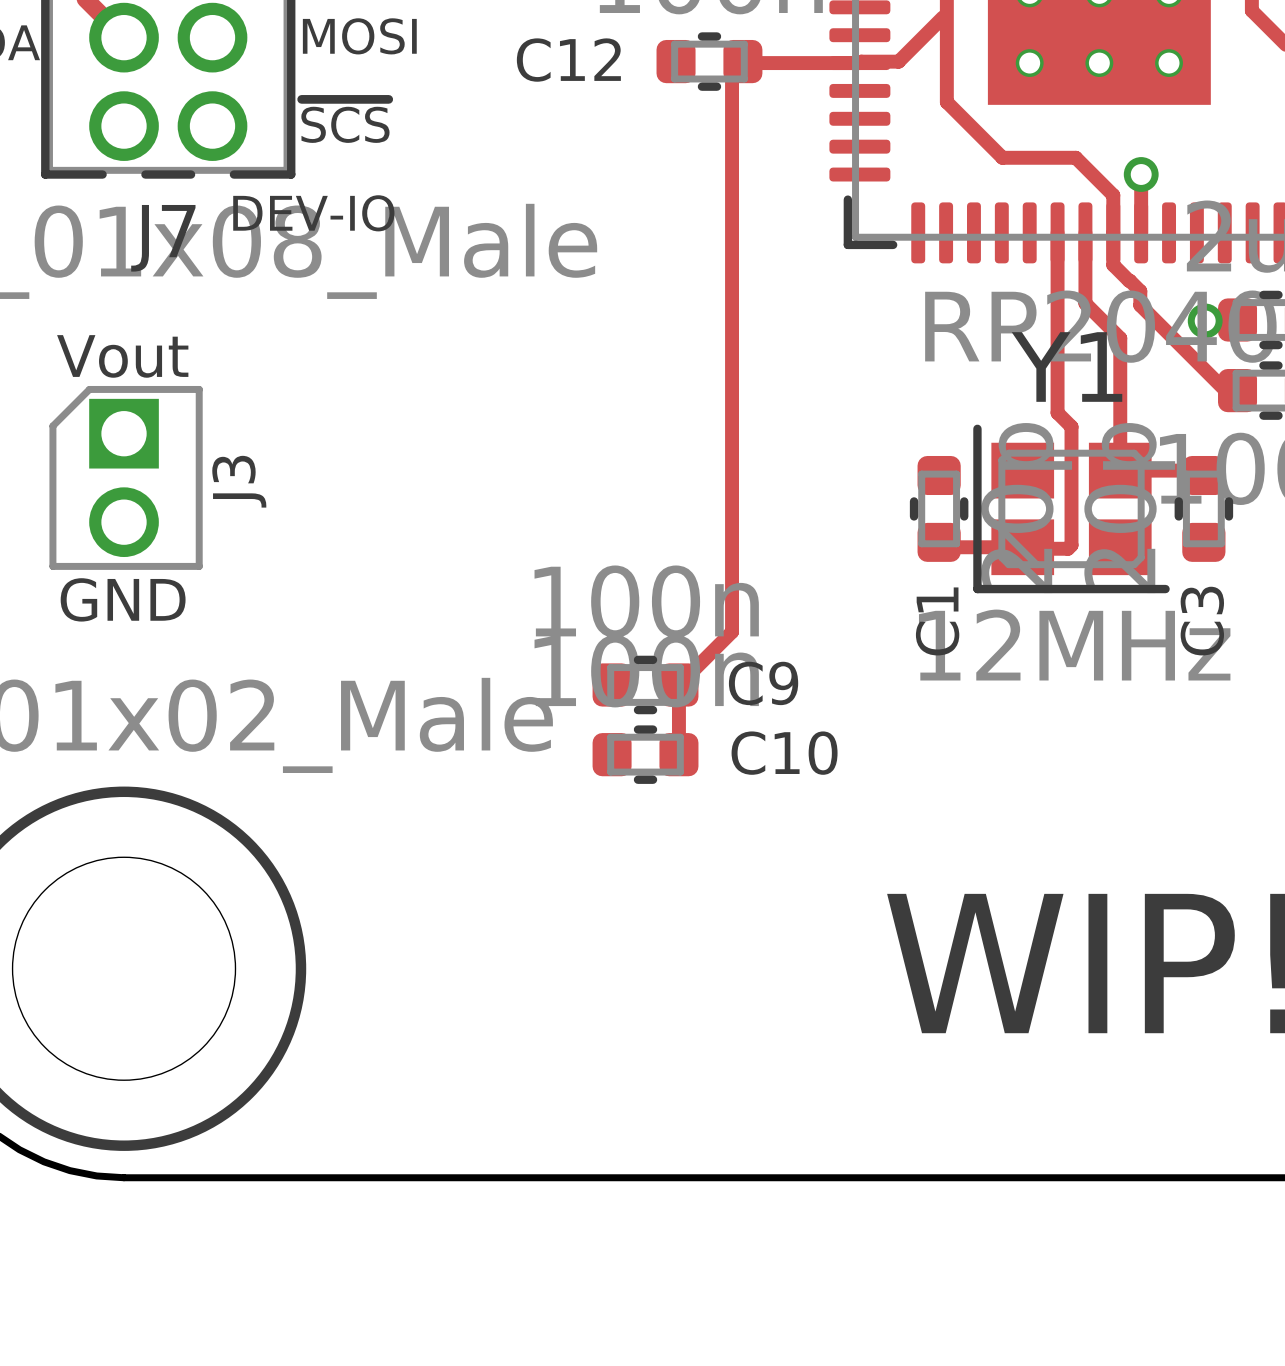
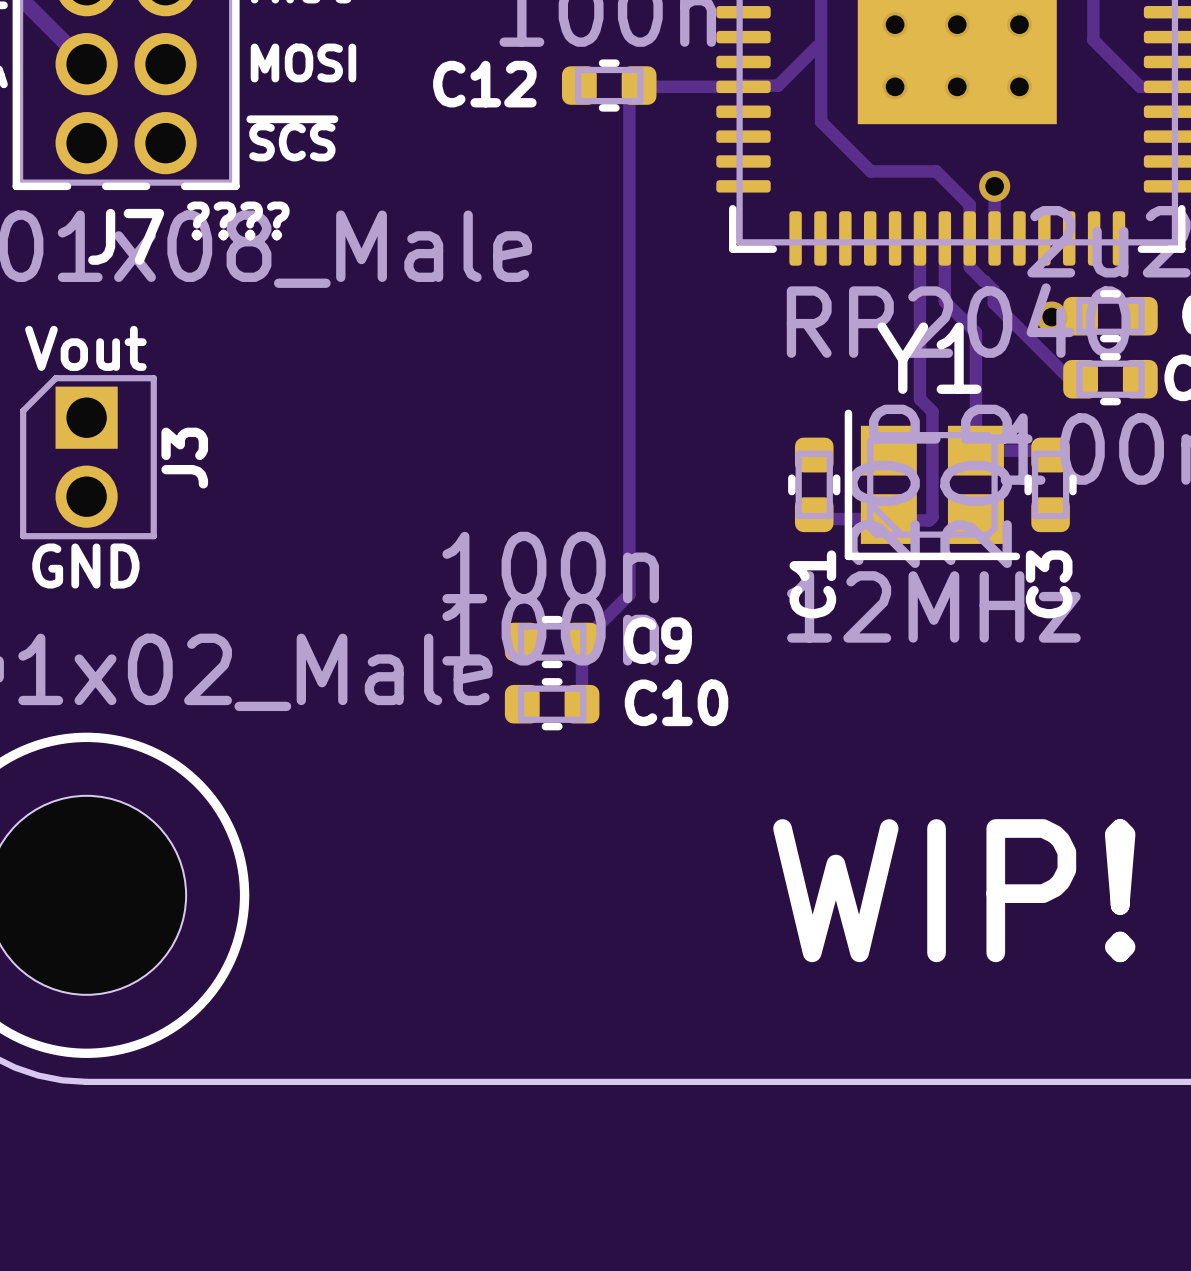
text: DEV-IO (313, 213) -> ???? (238, 220)

